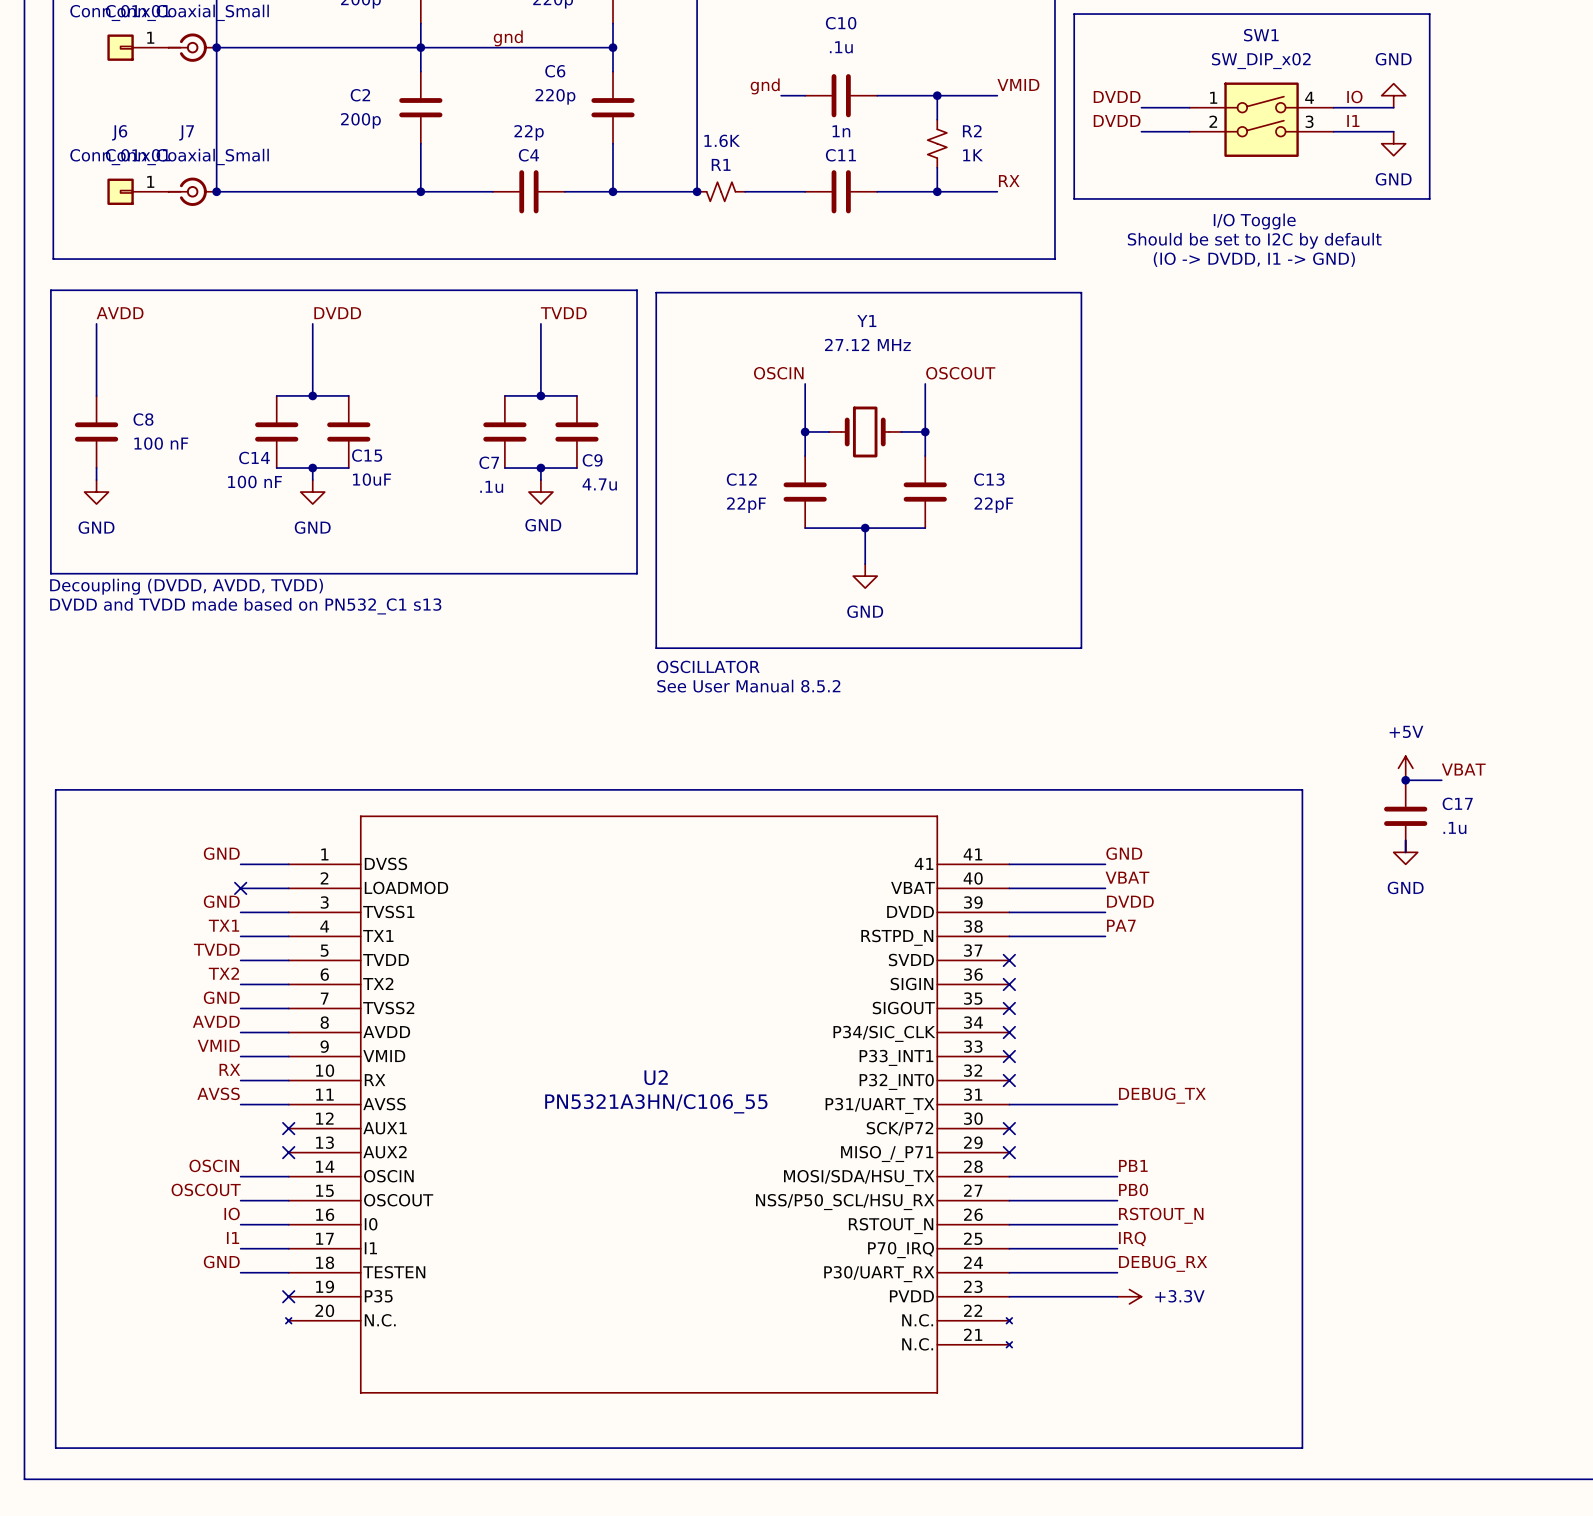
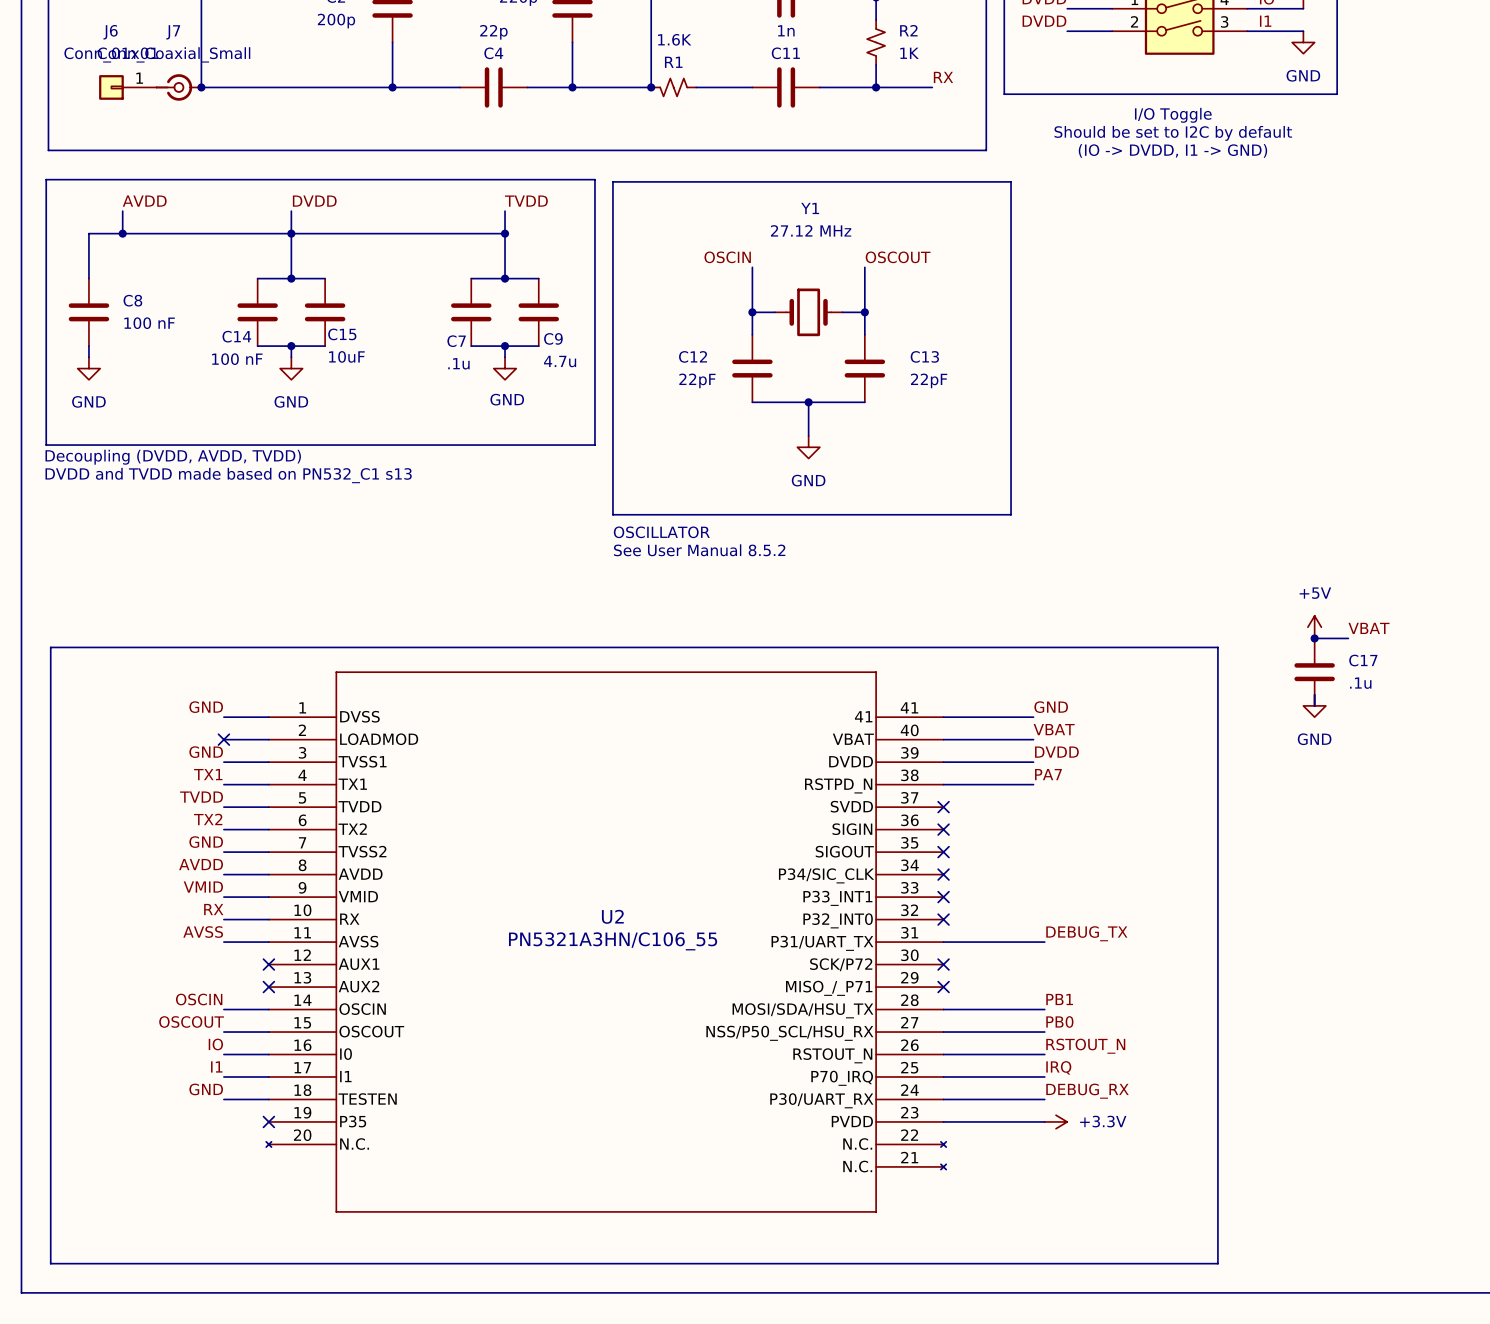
label position: AVDD (120, 313) -> AVDD (144, 201)
wire: (96, 323) (96, 347) -> (505, 233) (88, 233)
wire: none -> (122, 211) (122, 233)
junction: none -> (122, 233)
junction: none -> (291, 233)
junction: none -> (505, 233)

